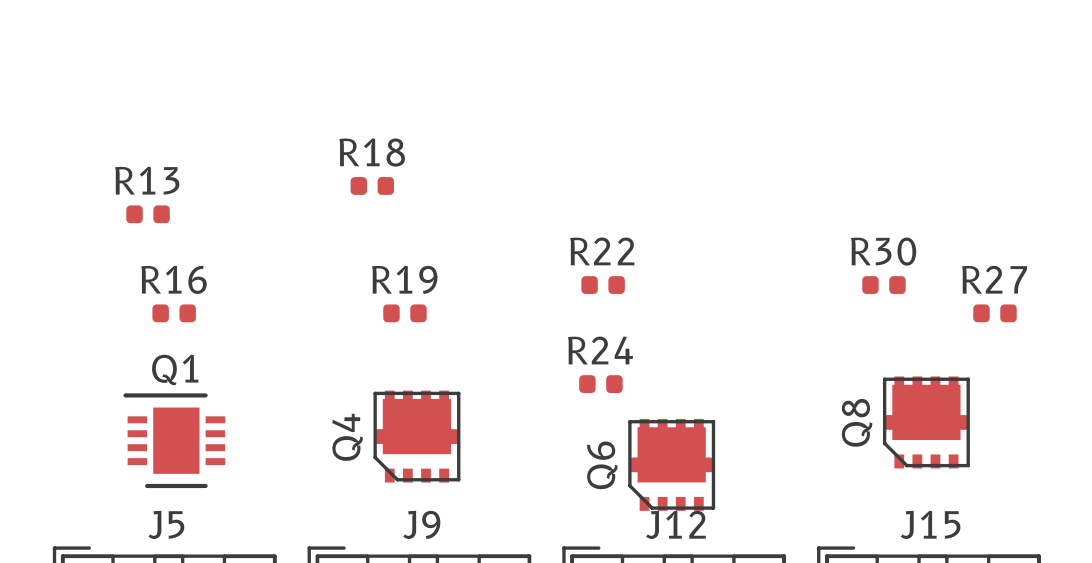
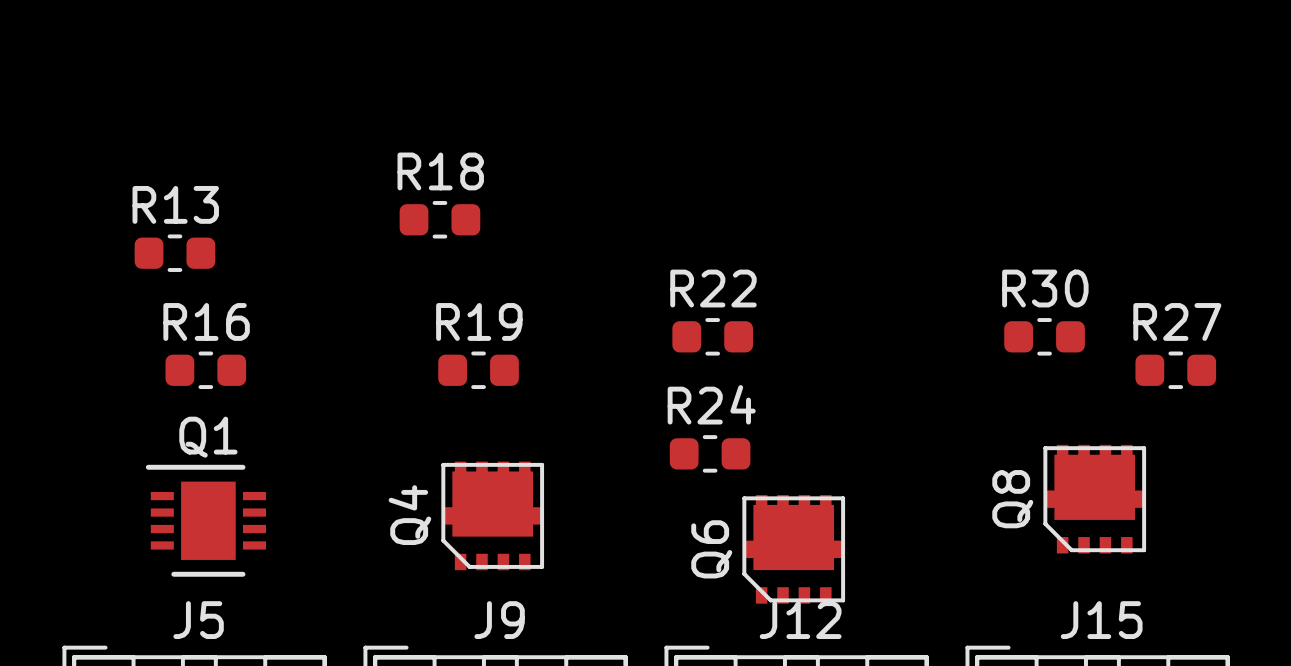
R18 footprint: [350, 177, 395, 195] -> [399, 200, 481, 239]
R13 footprint: [126, 205, 170, 224] -> [134, 234, 216, 272]
R22 footprint: [581, 276, 625, 294] -> [672, 318, 754, 356]
R30 footprint: [862, 276, 906, 294] -> [1004, 318, 1085, 356]
R16 footprint: [152, 304, 196, 323] -> [165, 351, 247, 390]
R19 footprint: [383, 304, 427, 323] -> [438, 351, 519, 390]
R27 footprint: [973, 304, 1017, 323] -> [1135, 351, 1217, 390]
R24 footprint: [579, 375, 623, 394] -> [669, 435, 751, 473]

